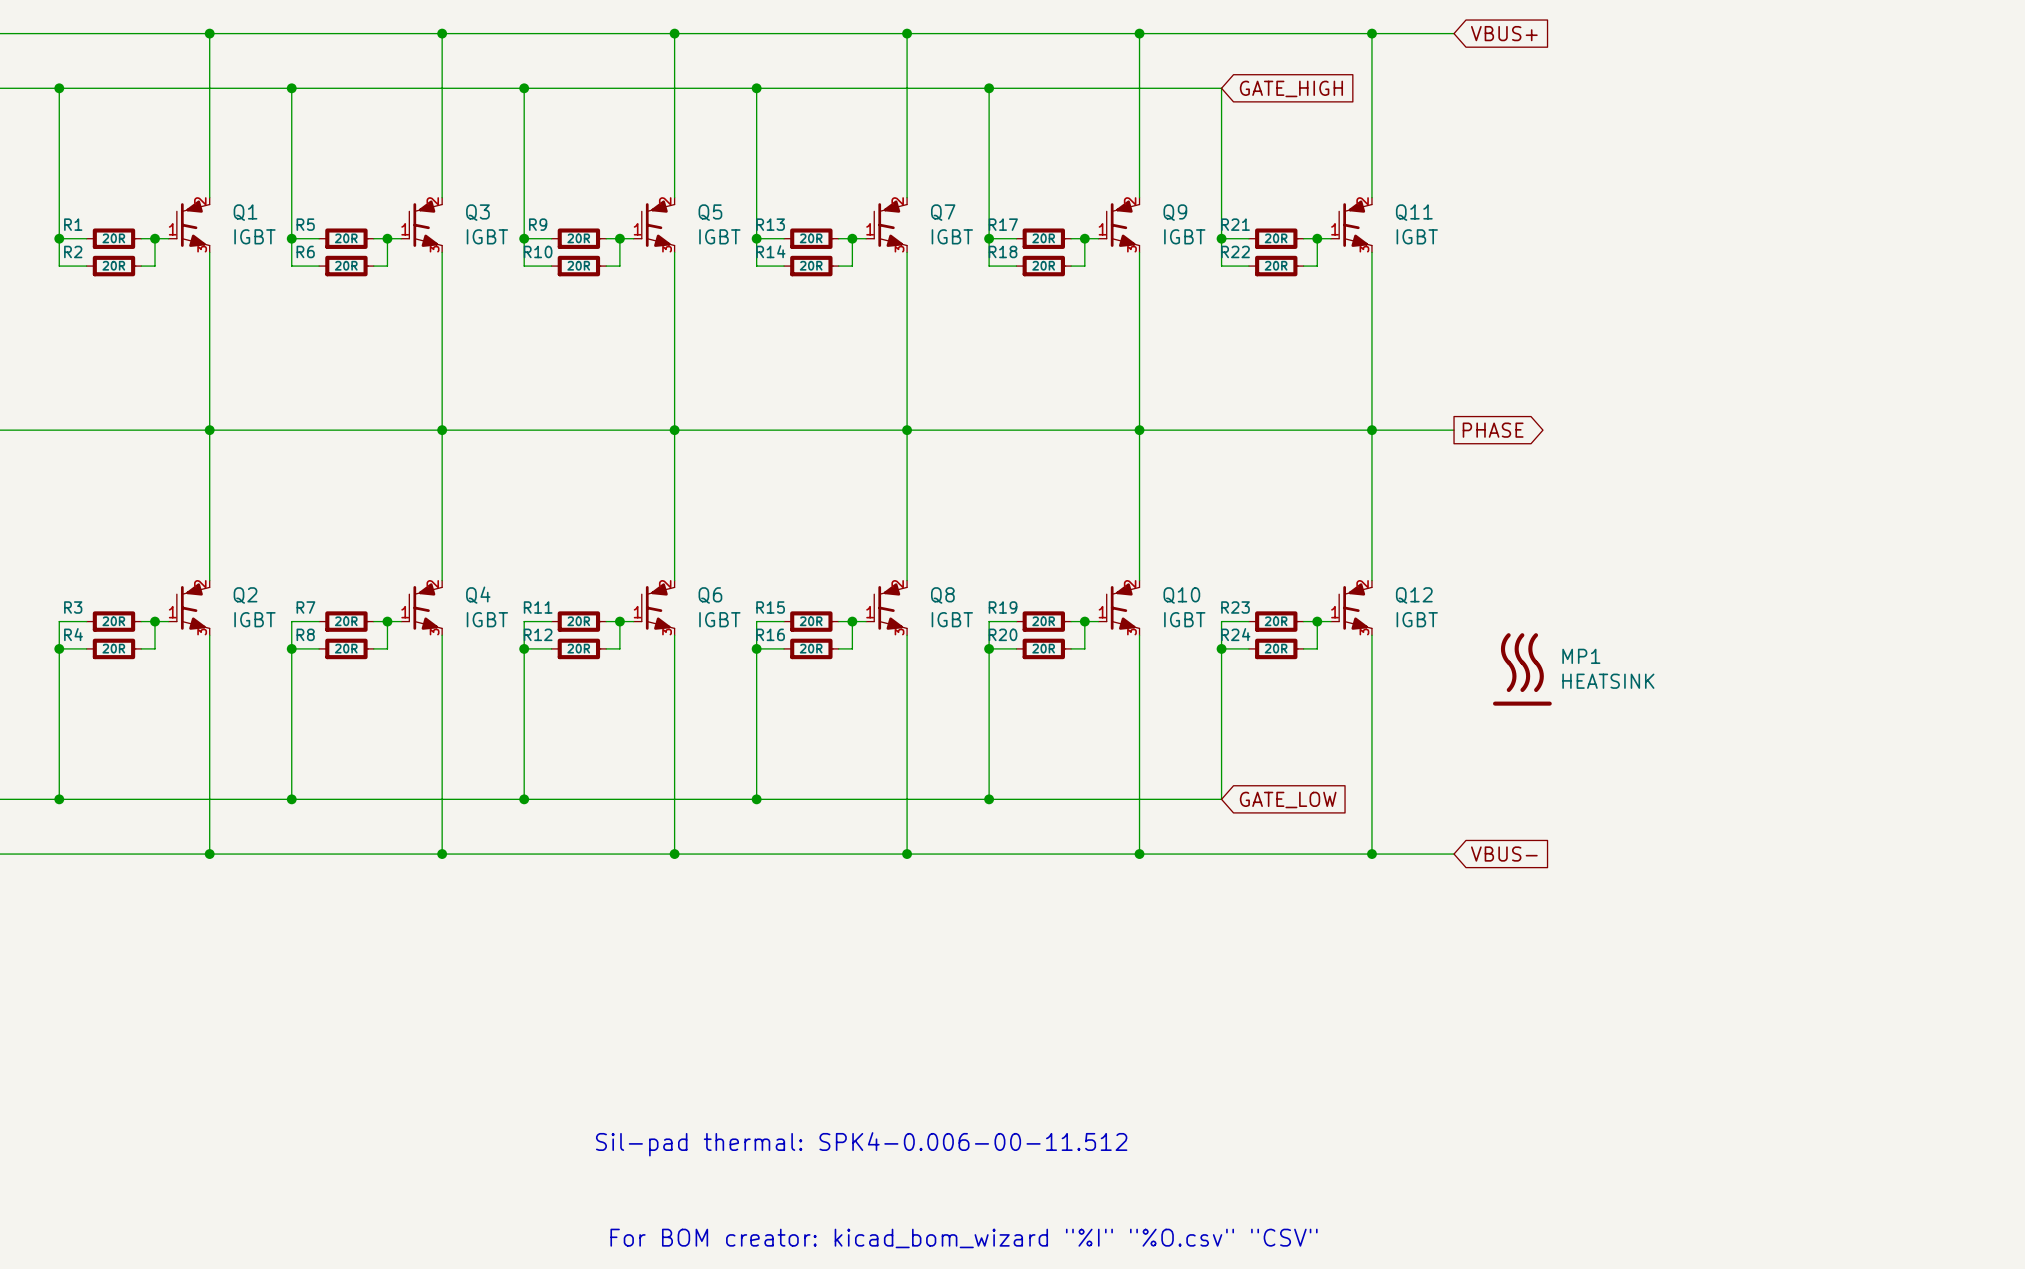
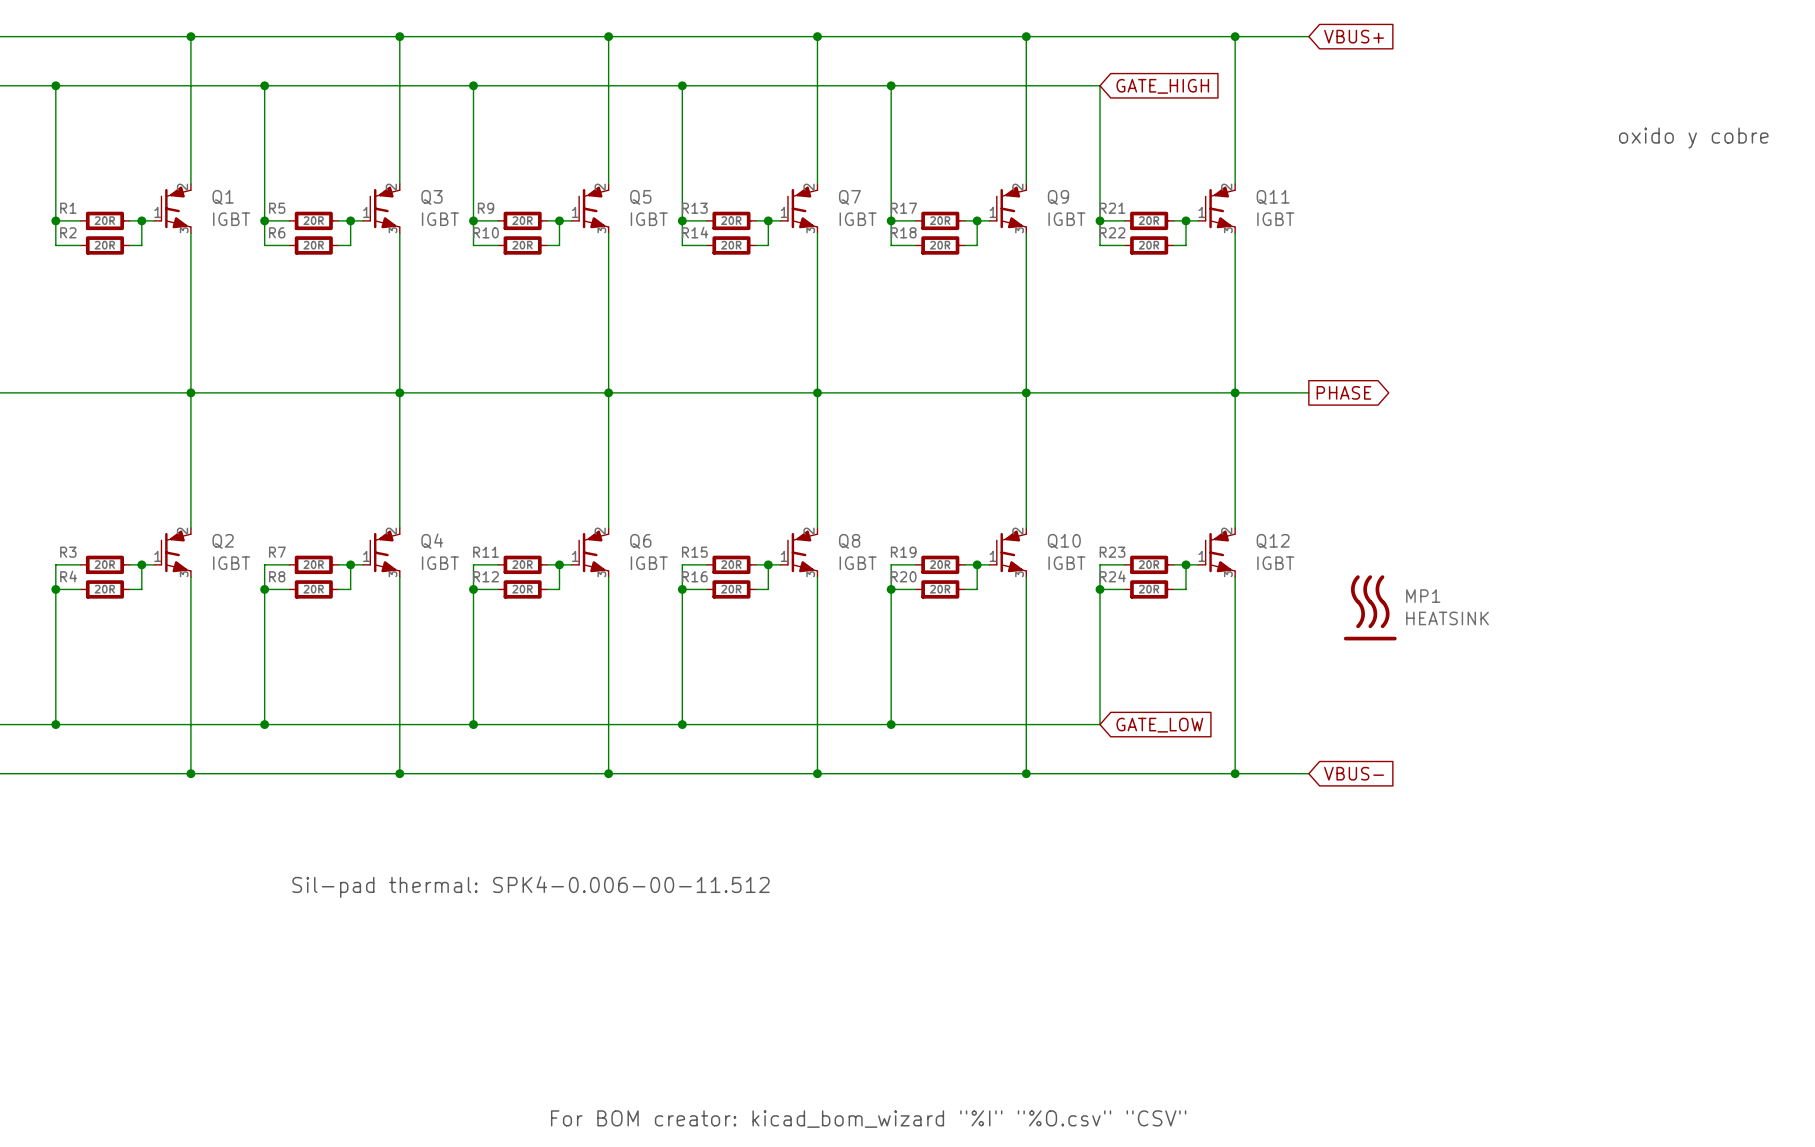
text: none -> oxido y cobre (1693, 138)
text: none -> Sil-pad thermal: SPK4-0.006-00-11.512 (530, 887)
text: Sil-pad thermal: SPK4-0.006-00-11.512 (861, 1144) -> none

